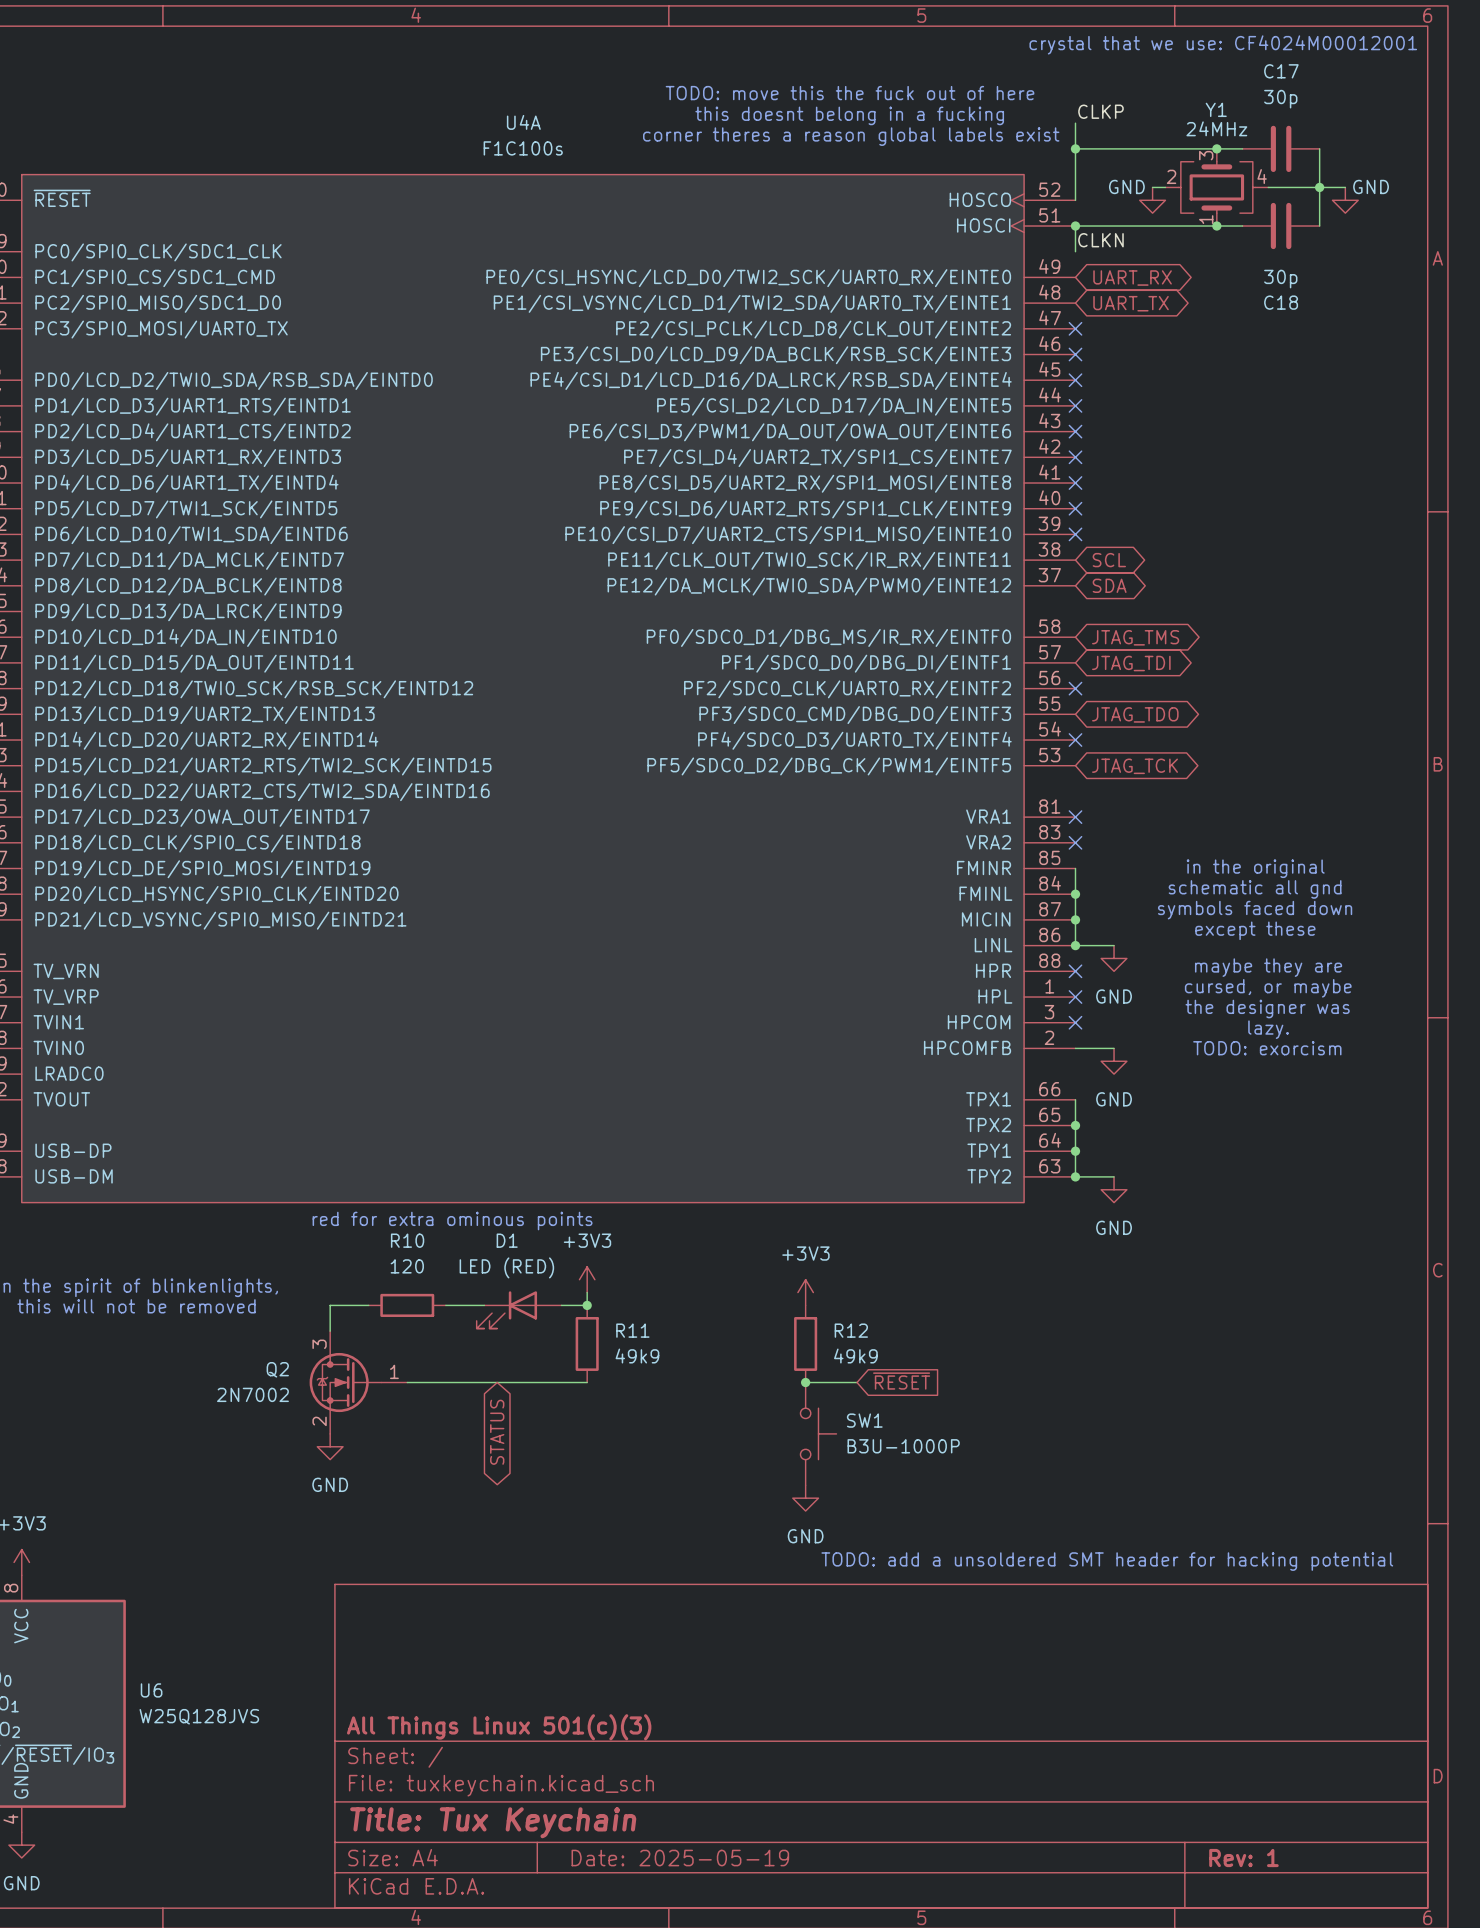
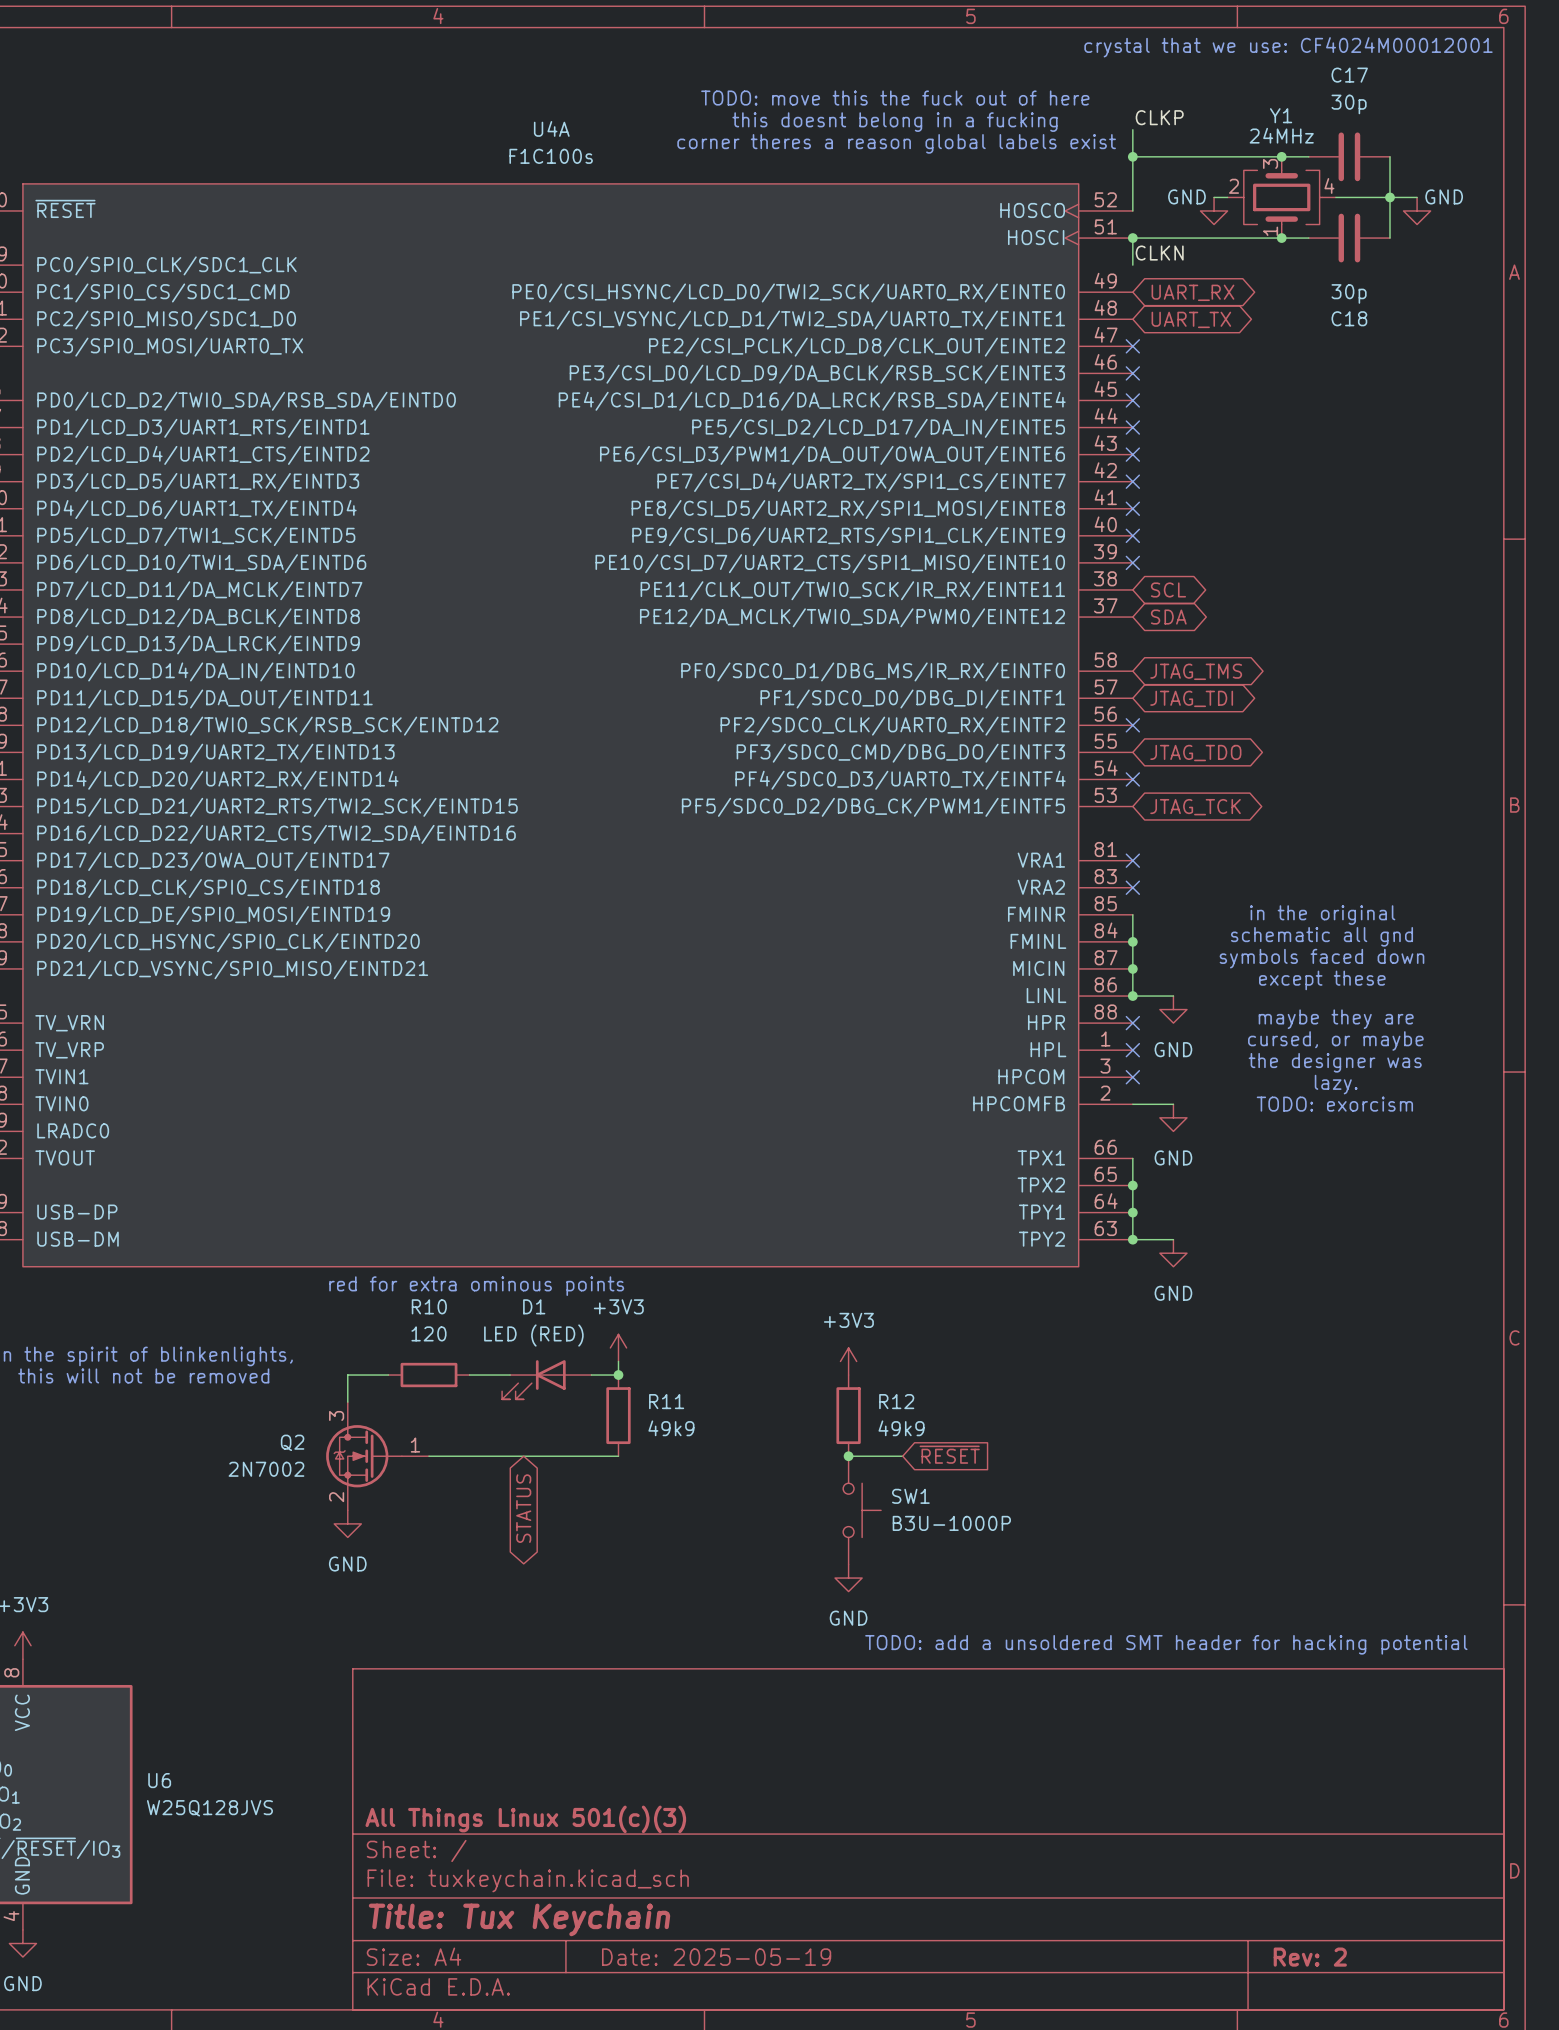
title block: Rev: 1 (1243, 1858) -> Rev: 2 (1310, 1957)

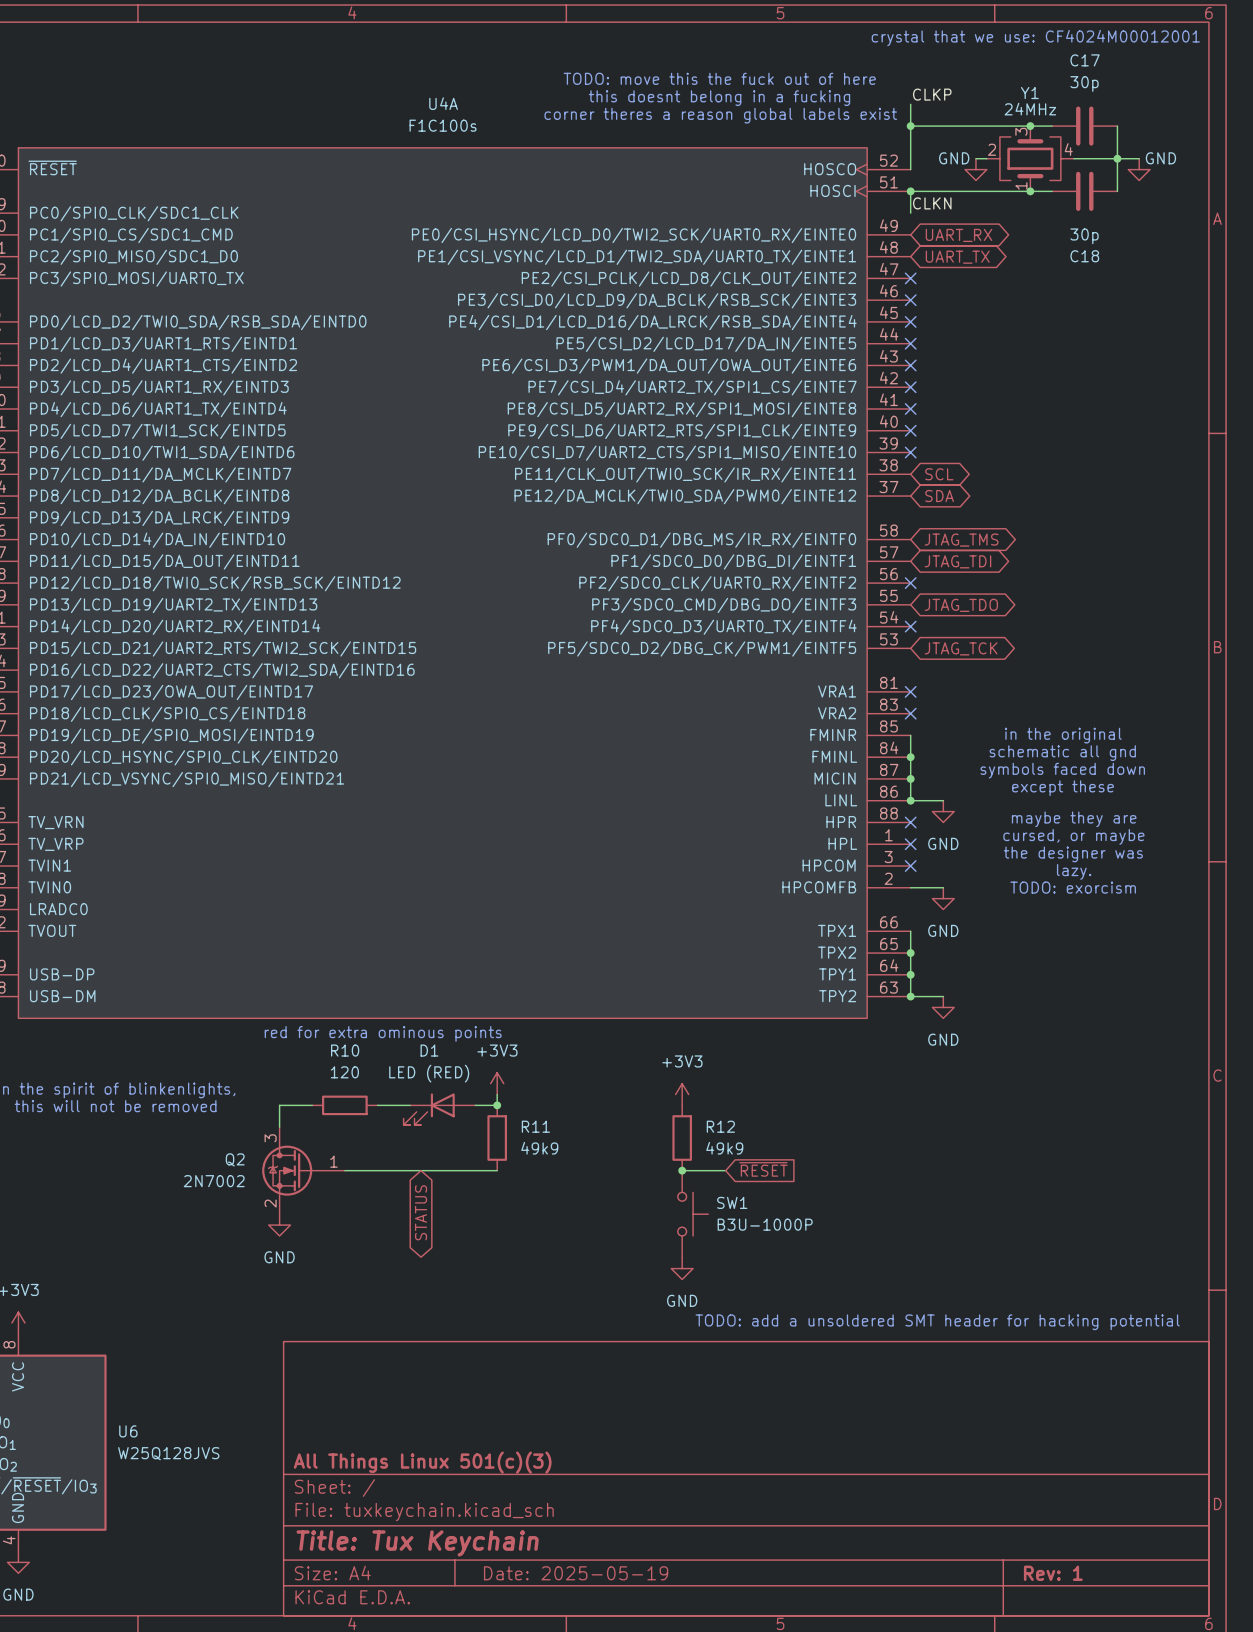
title block: Rev: 2 (1310, 1957) -> Rev: 1 (1053, 1573)

